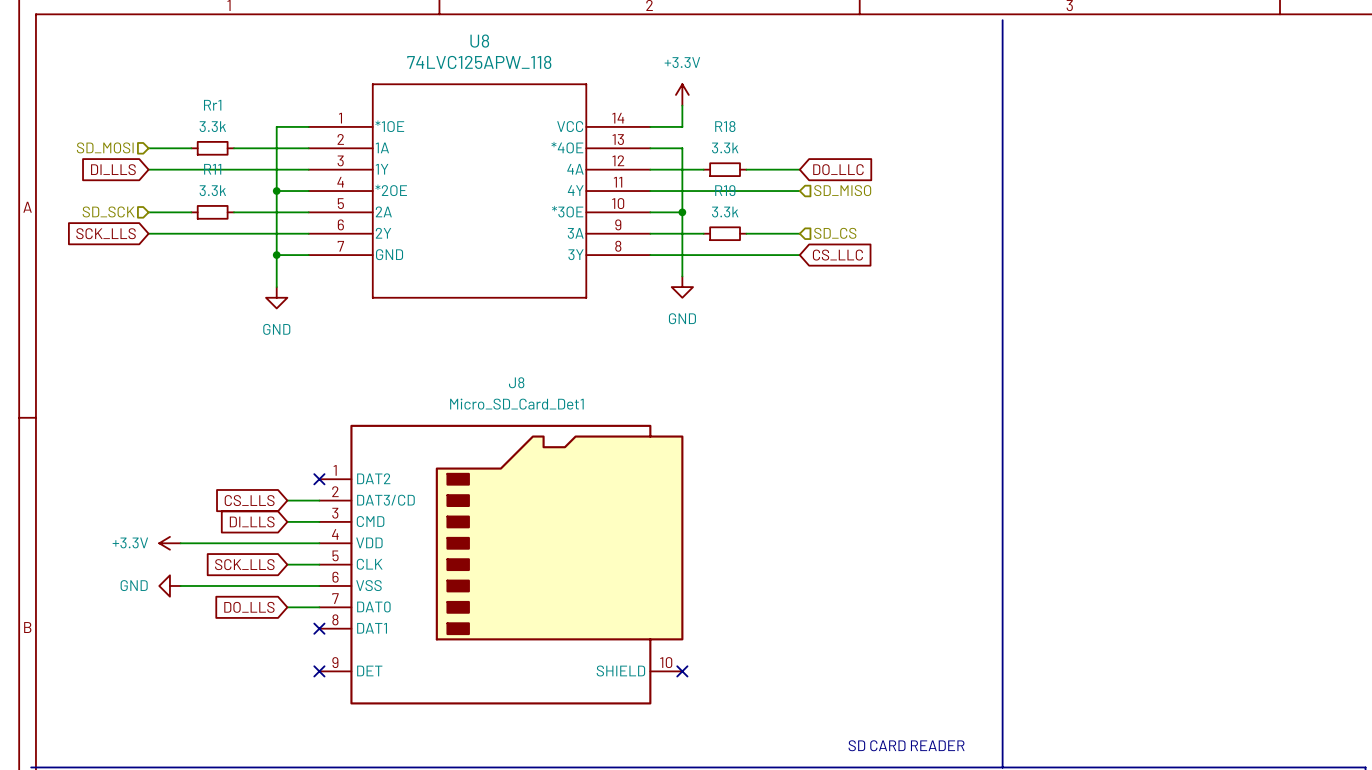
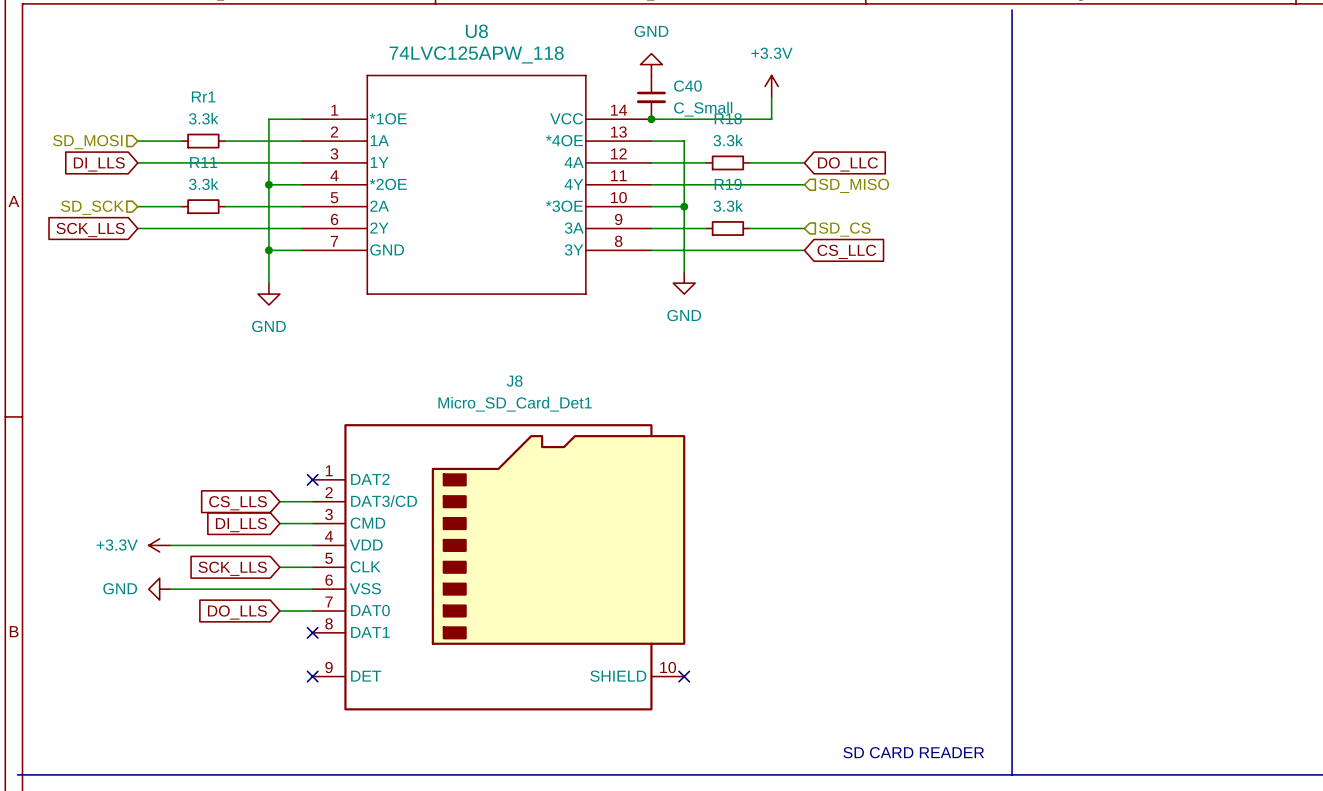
power symbol: none -> GND (651, 64)
power symbol position: +3.3V (682, 94) -> +3.3V (771, 86)
C40: none -> C_Small (651, 97)
wire: (682, 105) (682, 126) -> (771, 97) (771, 119) (684, 119)
junction: none -> (651, 119)

